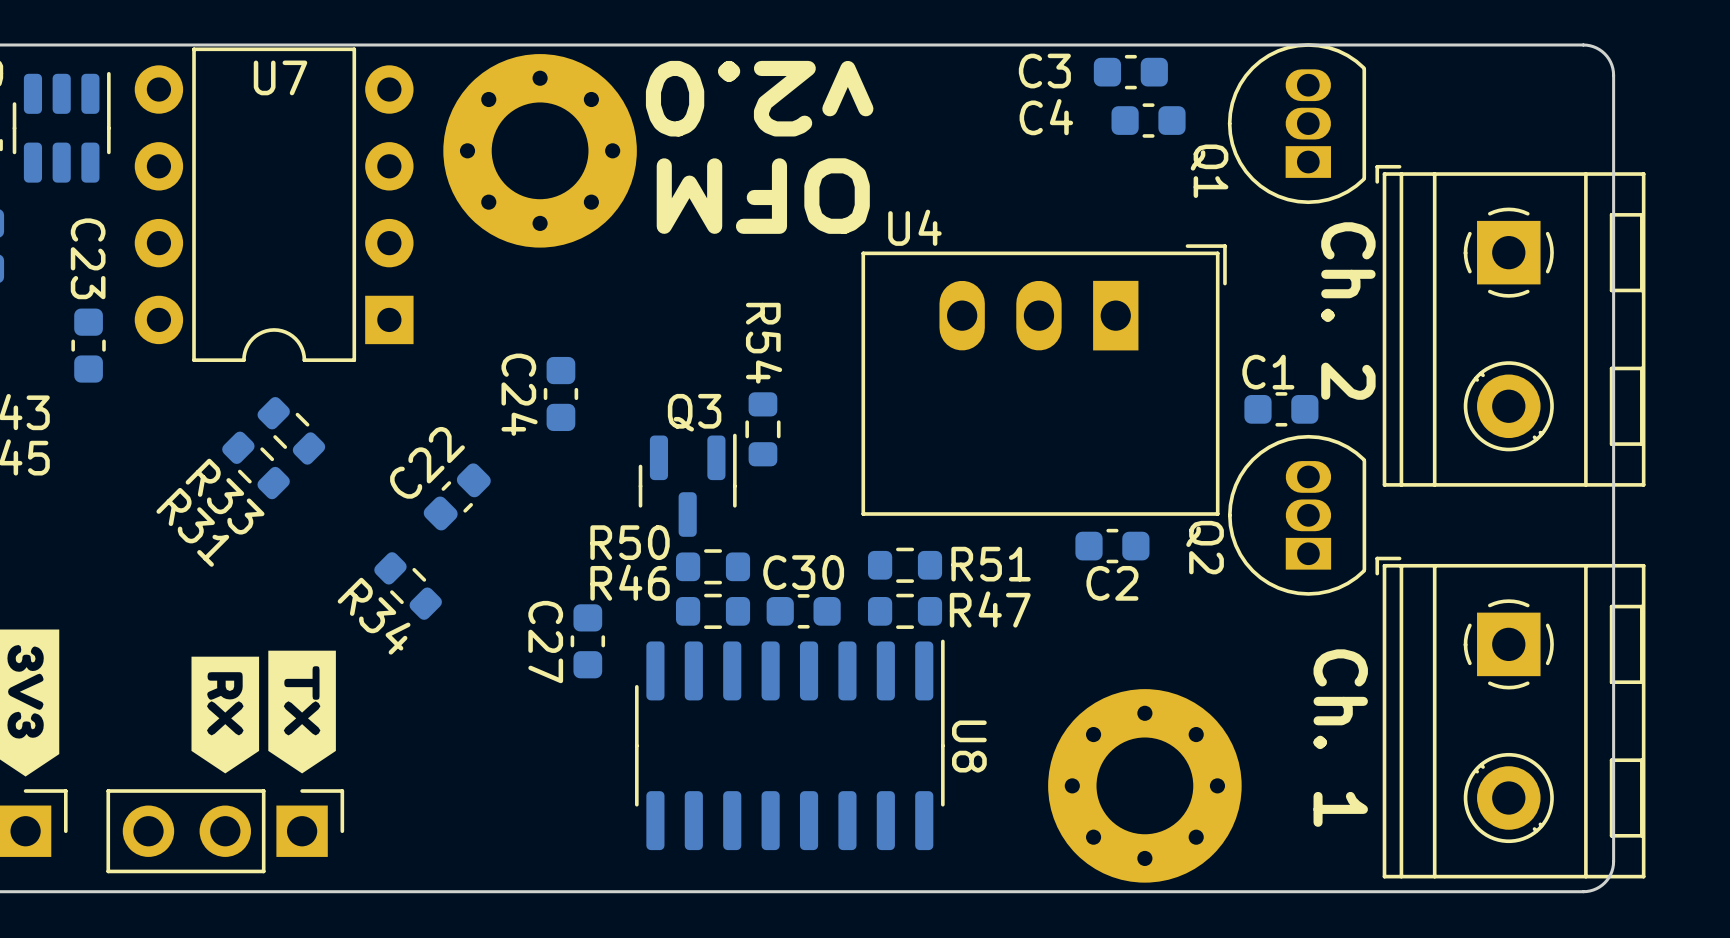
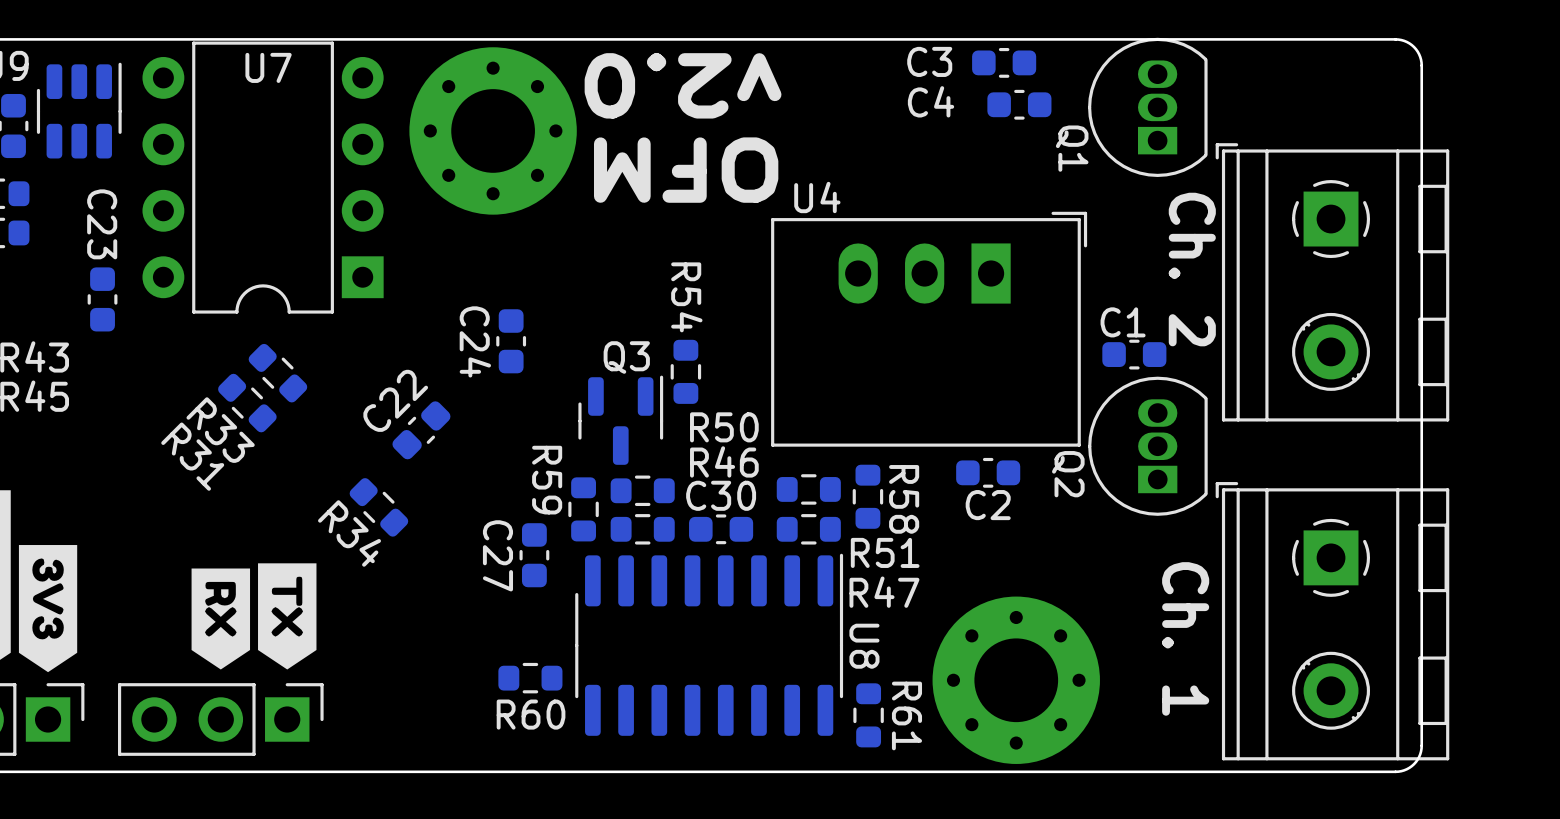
R50 name position: R50 (630, 542) -> R50 (724, 427)
R51 name position: R51 (991, 564) -> R51 (885, 552)
R58: none -> (867, 496)
R46 name position: R46 (630, 582) -> R46 (724, 461)
R59: none -> (583, 509)
R47 name position: R47 (990, 609) -> R47 (884, 592)
R60: none -> (530, 678)
R61: none -> (868, 715)

